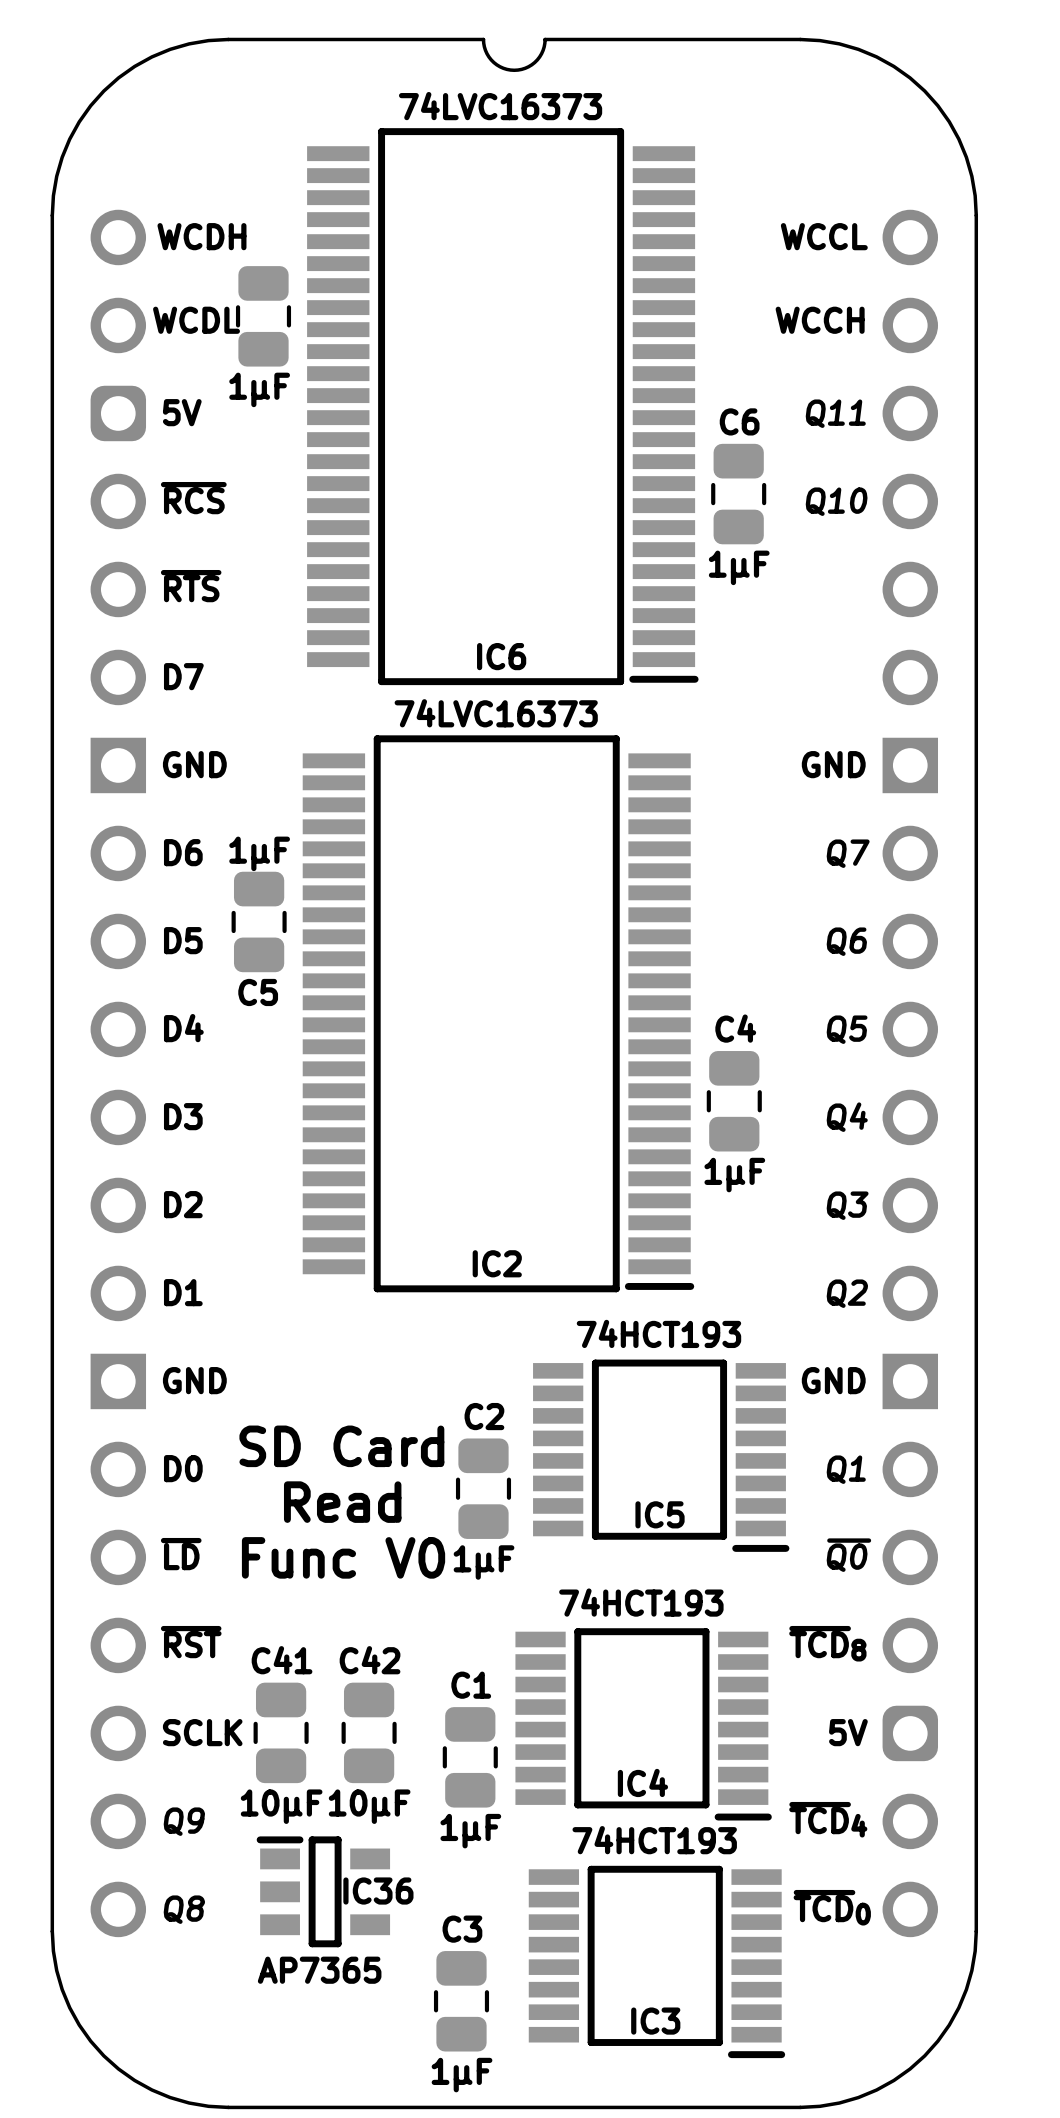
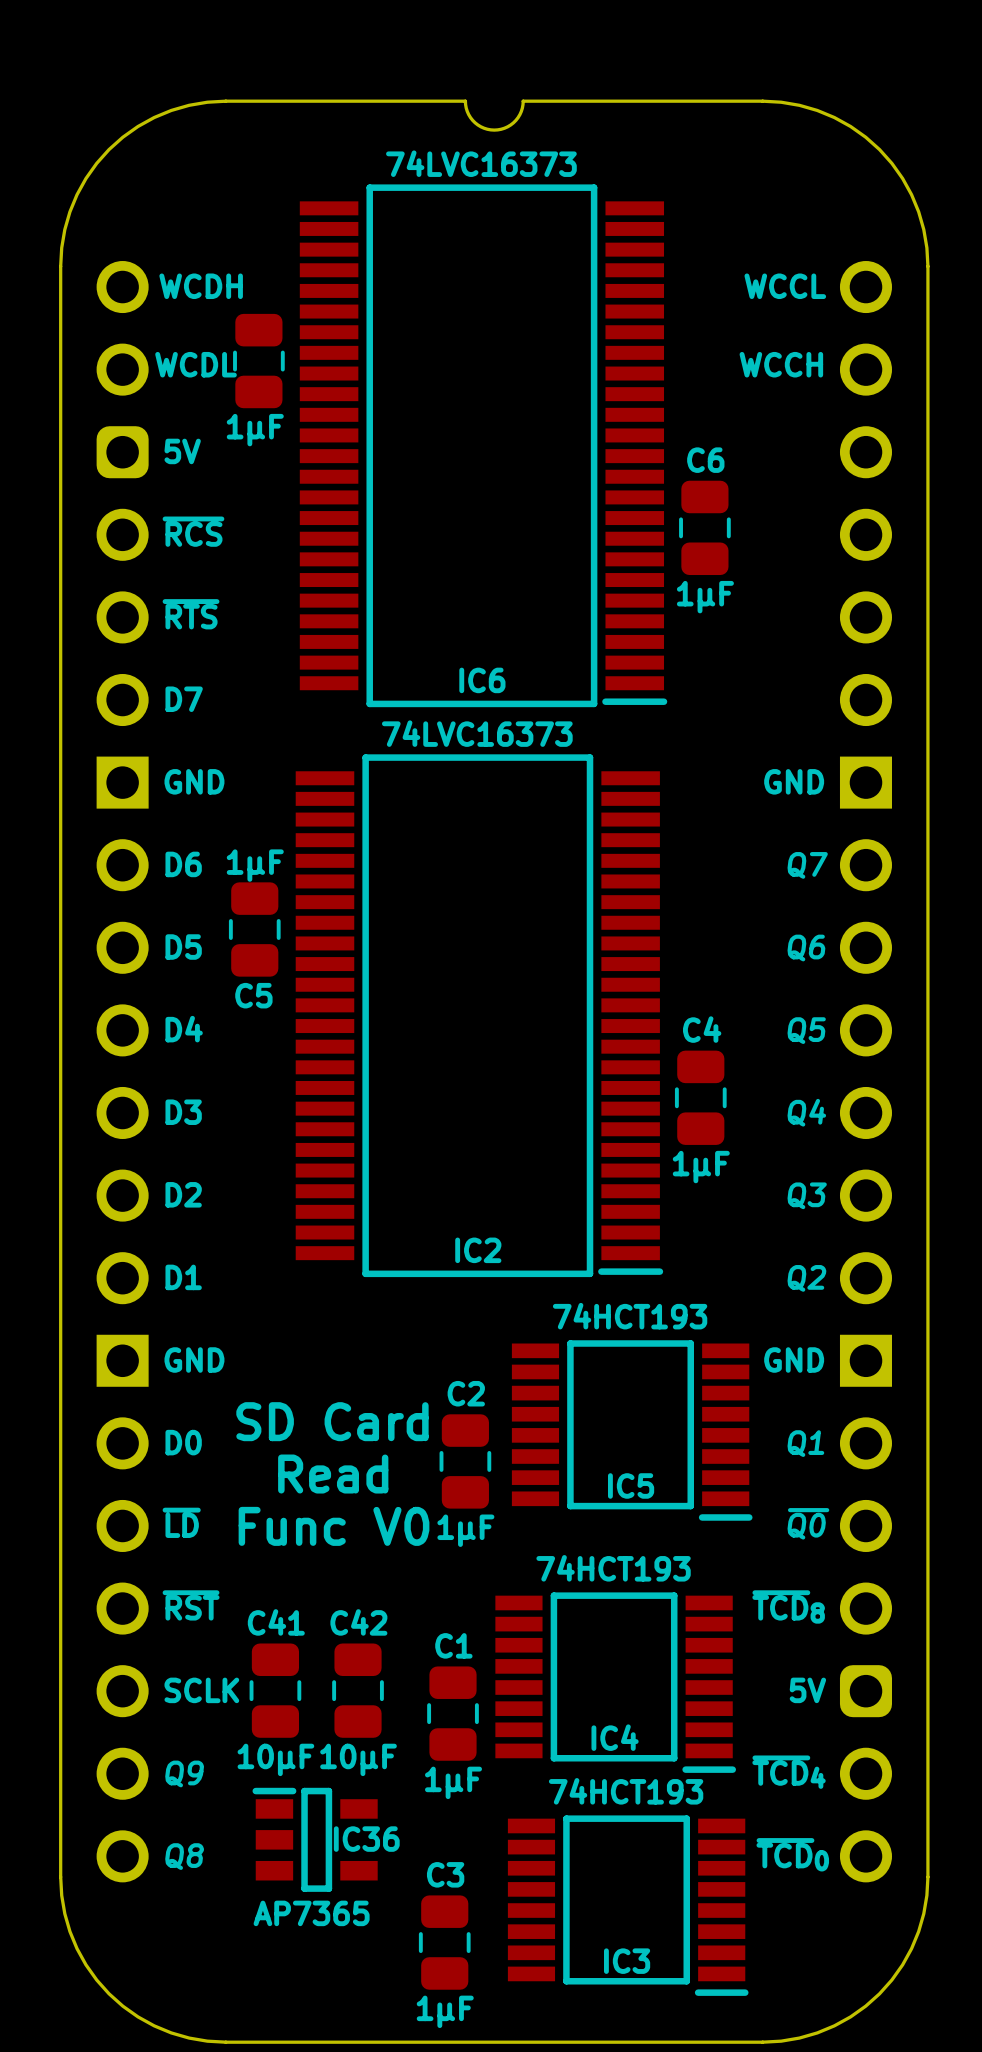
text: Q11 (835, 413) -> none
text: Q10 (836, 501) -> none

